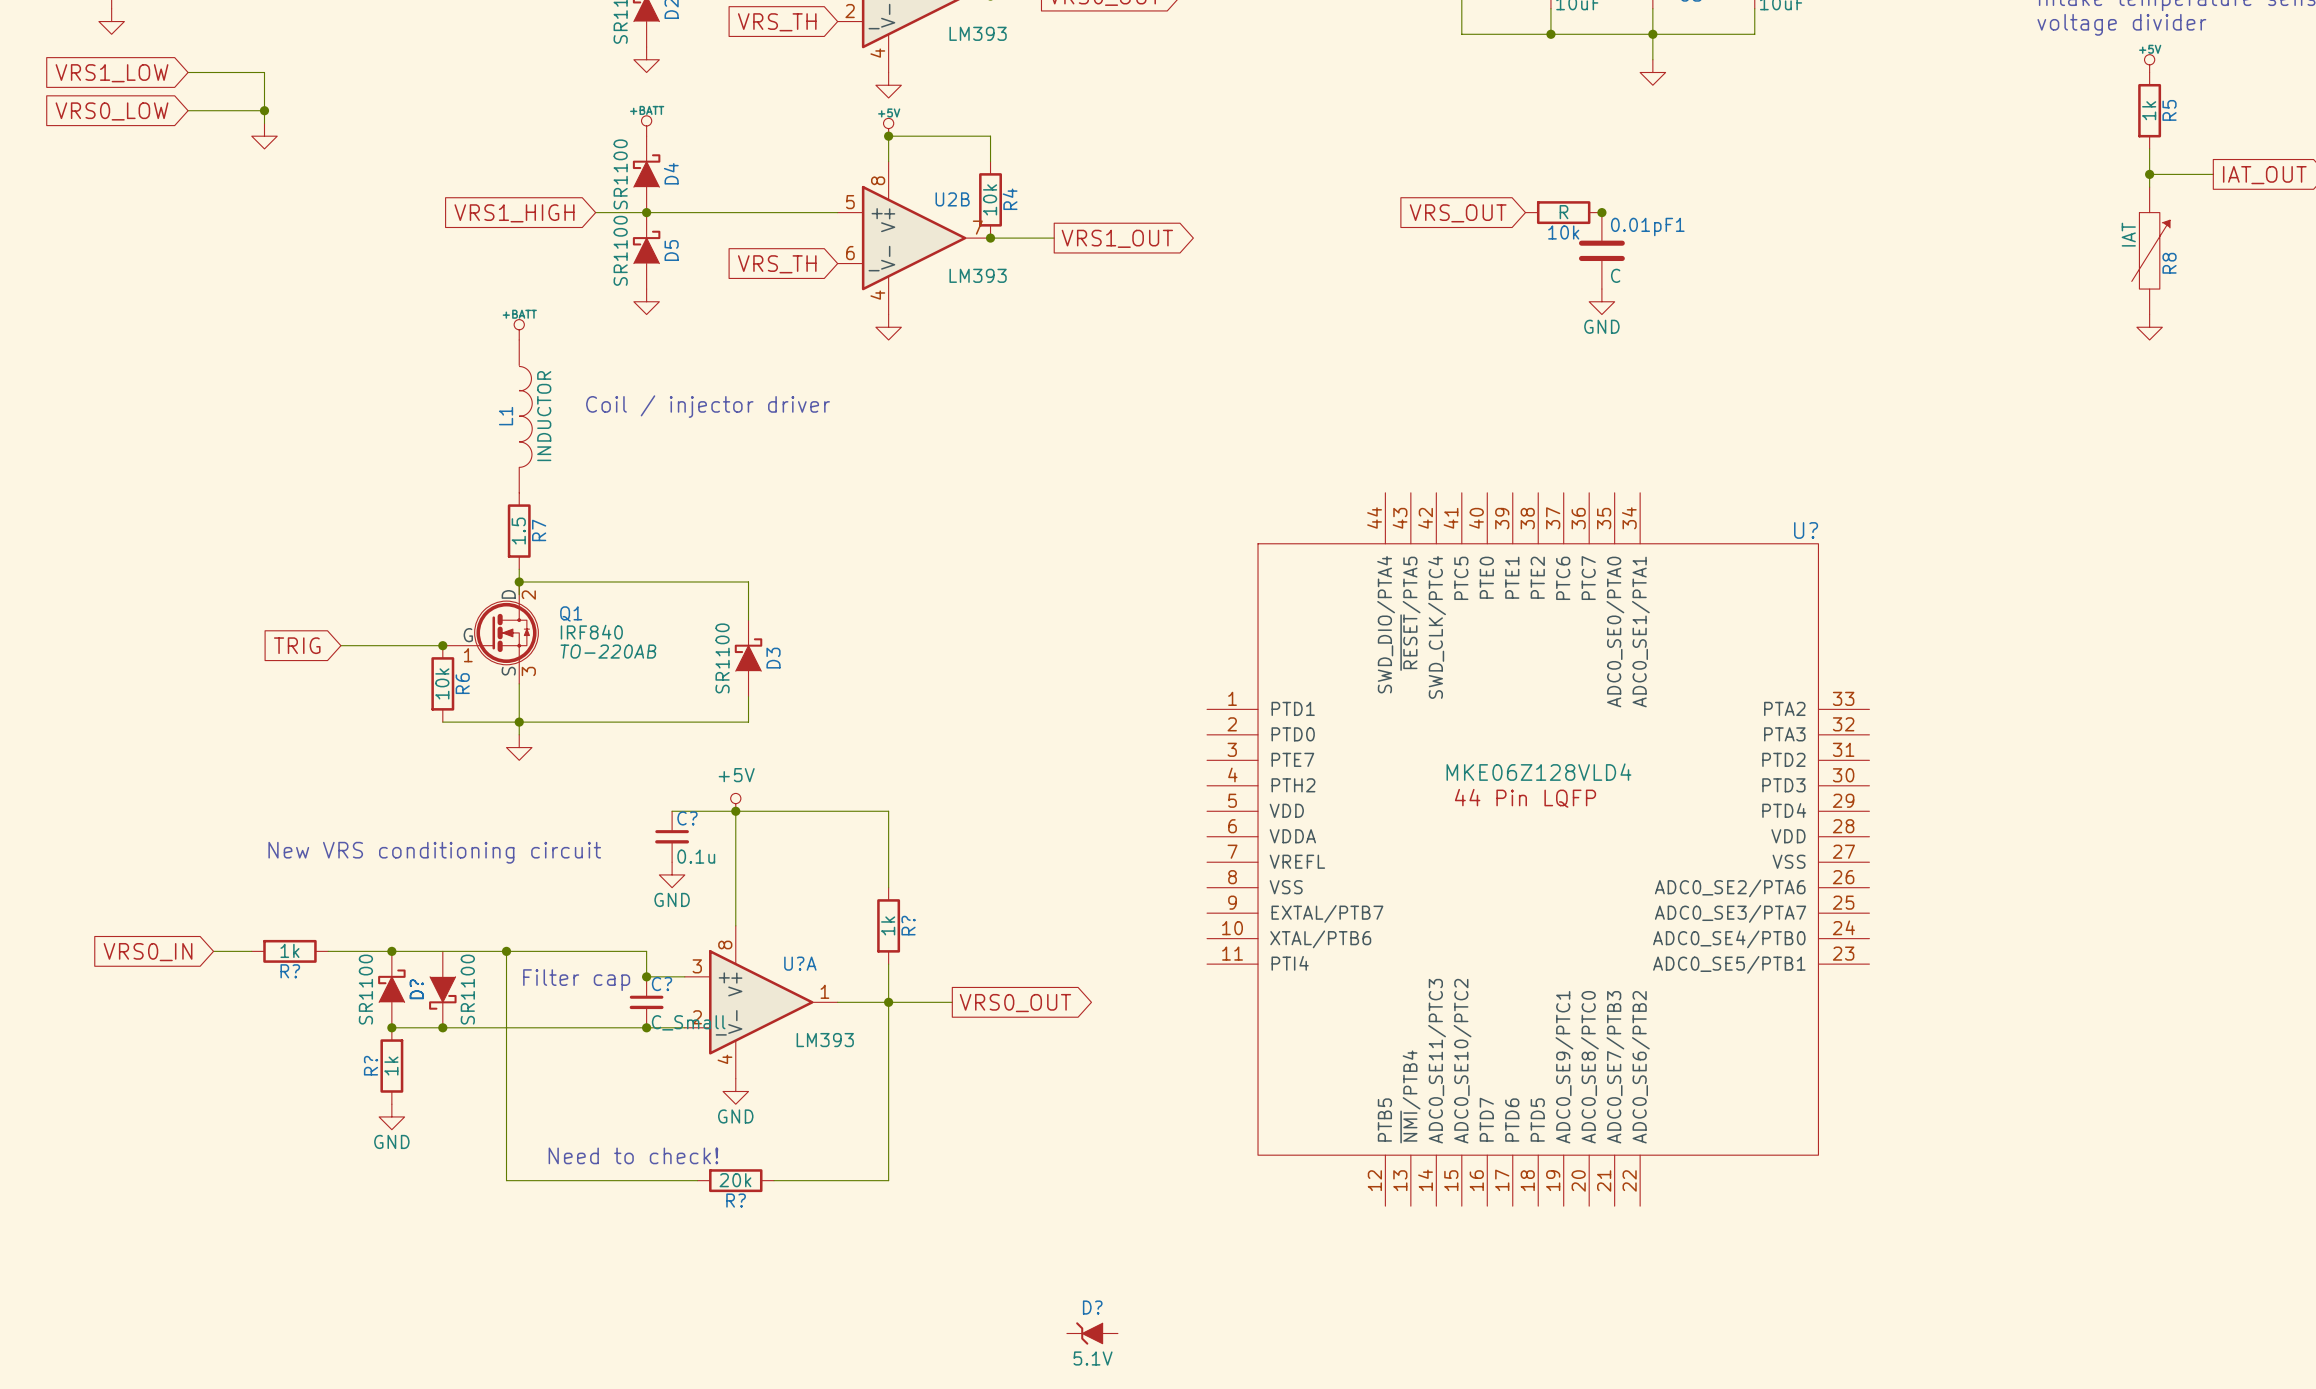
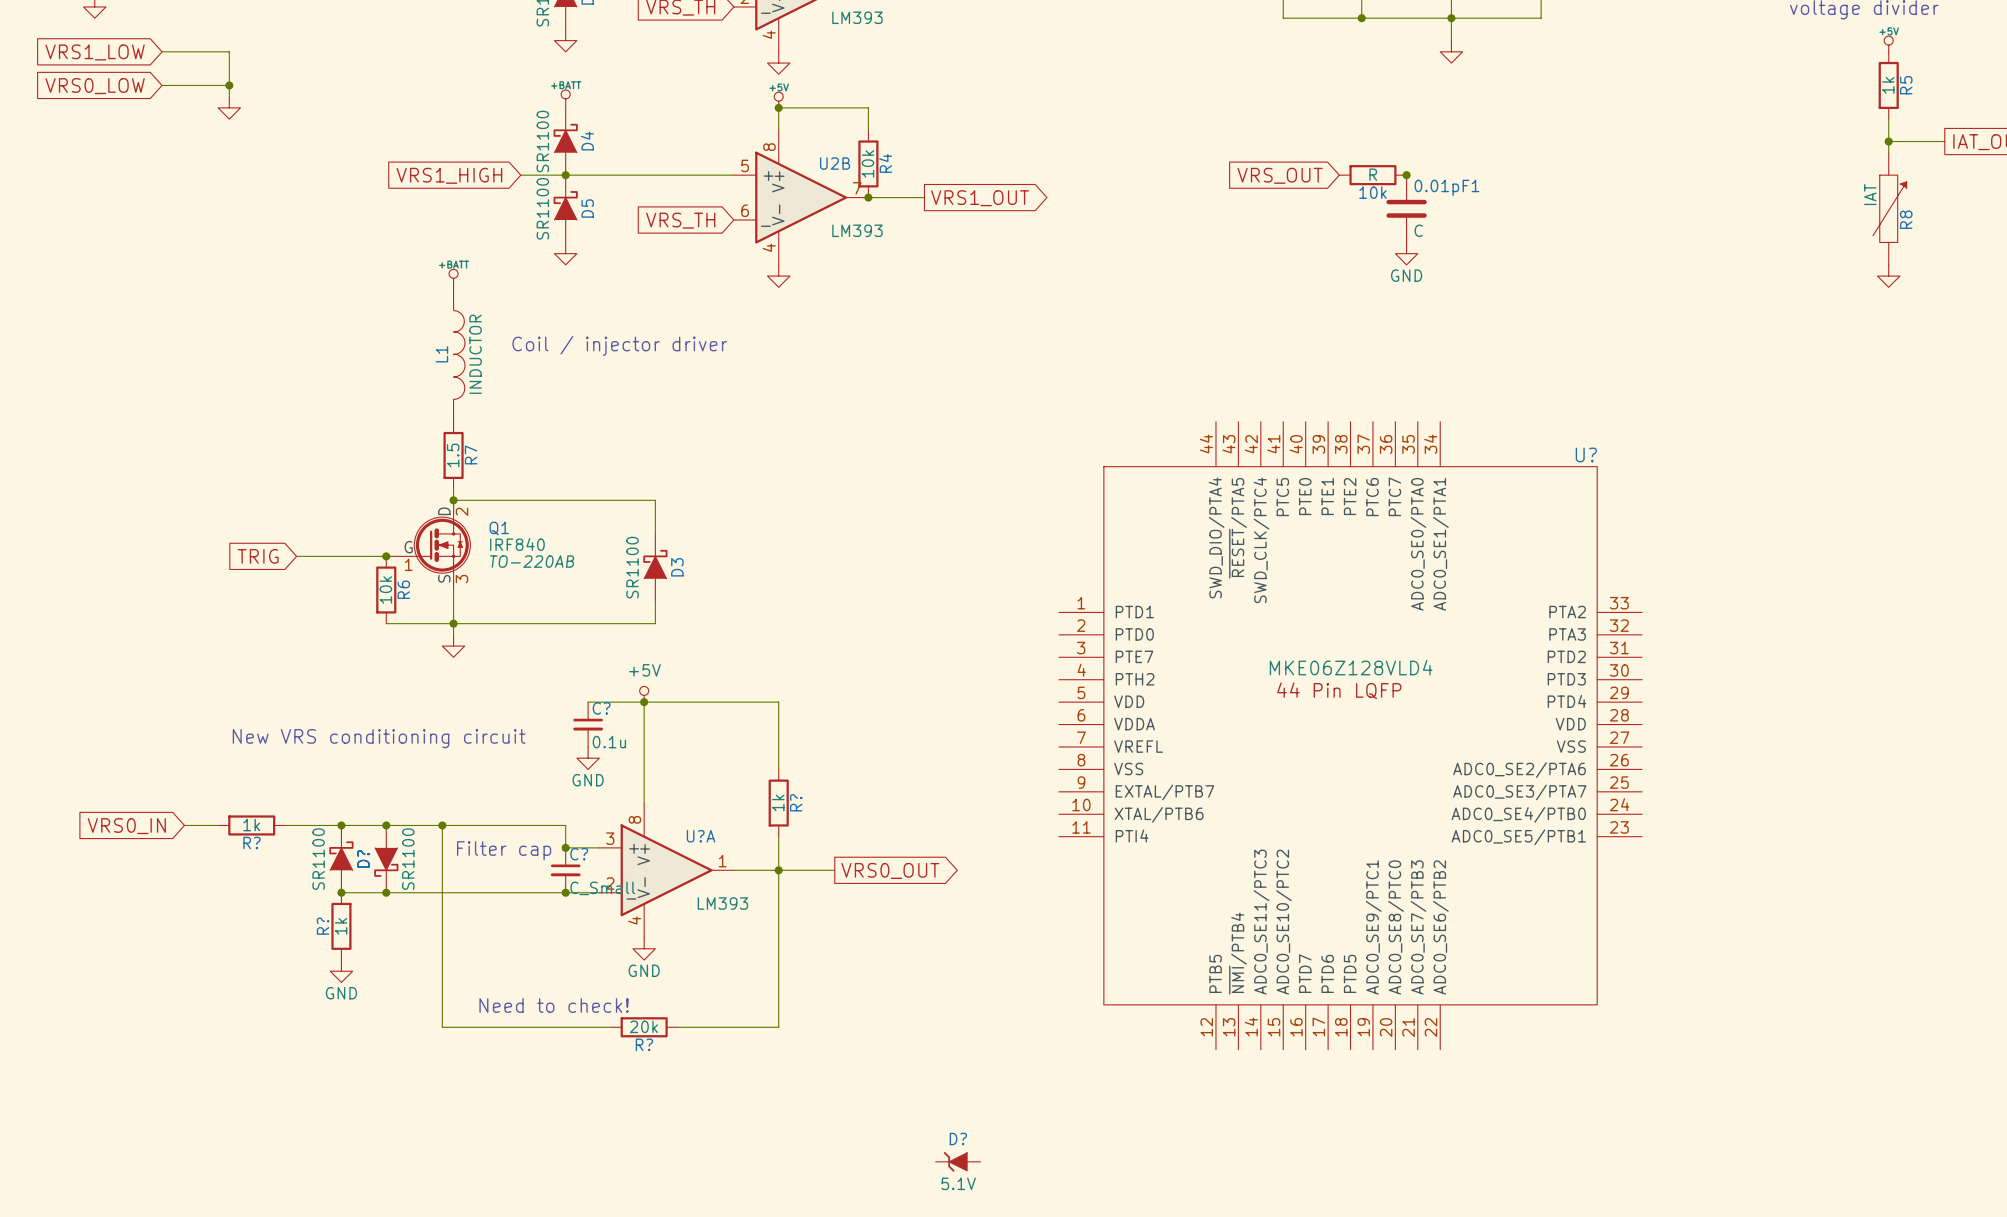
junction: none -> (386, 825)

